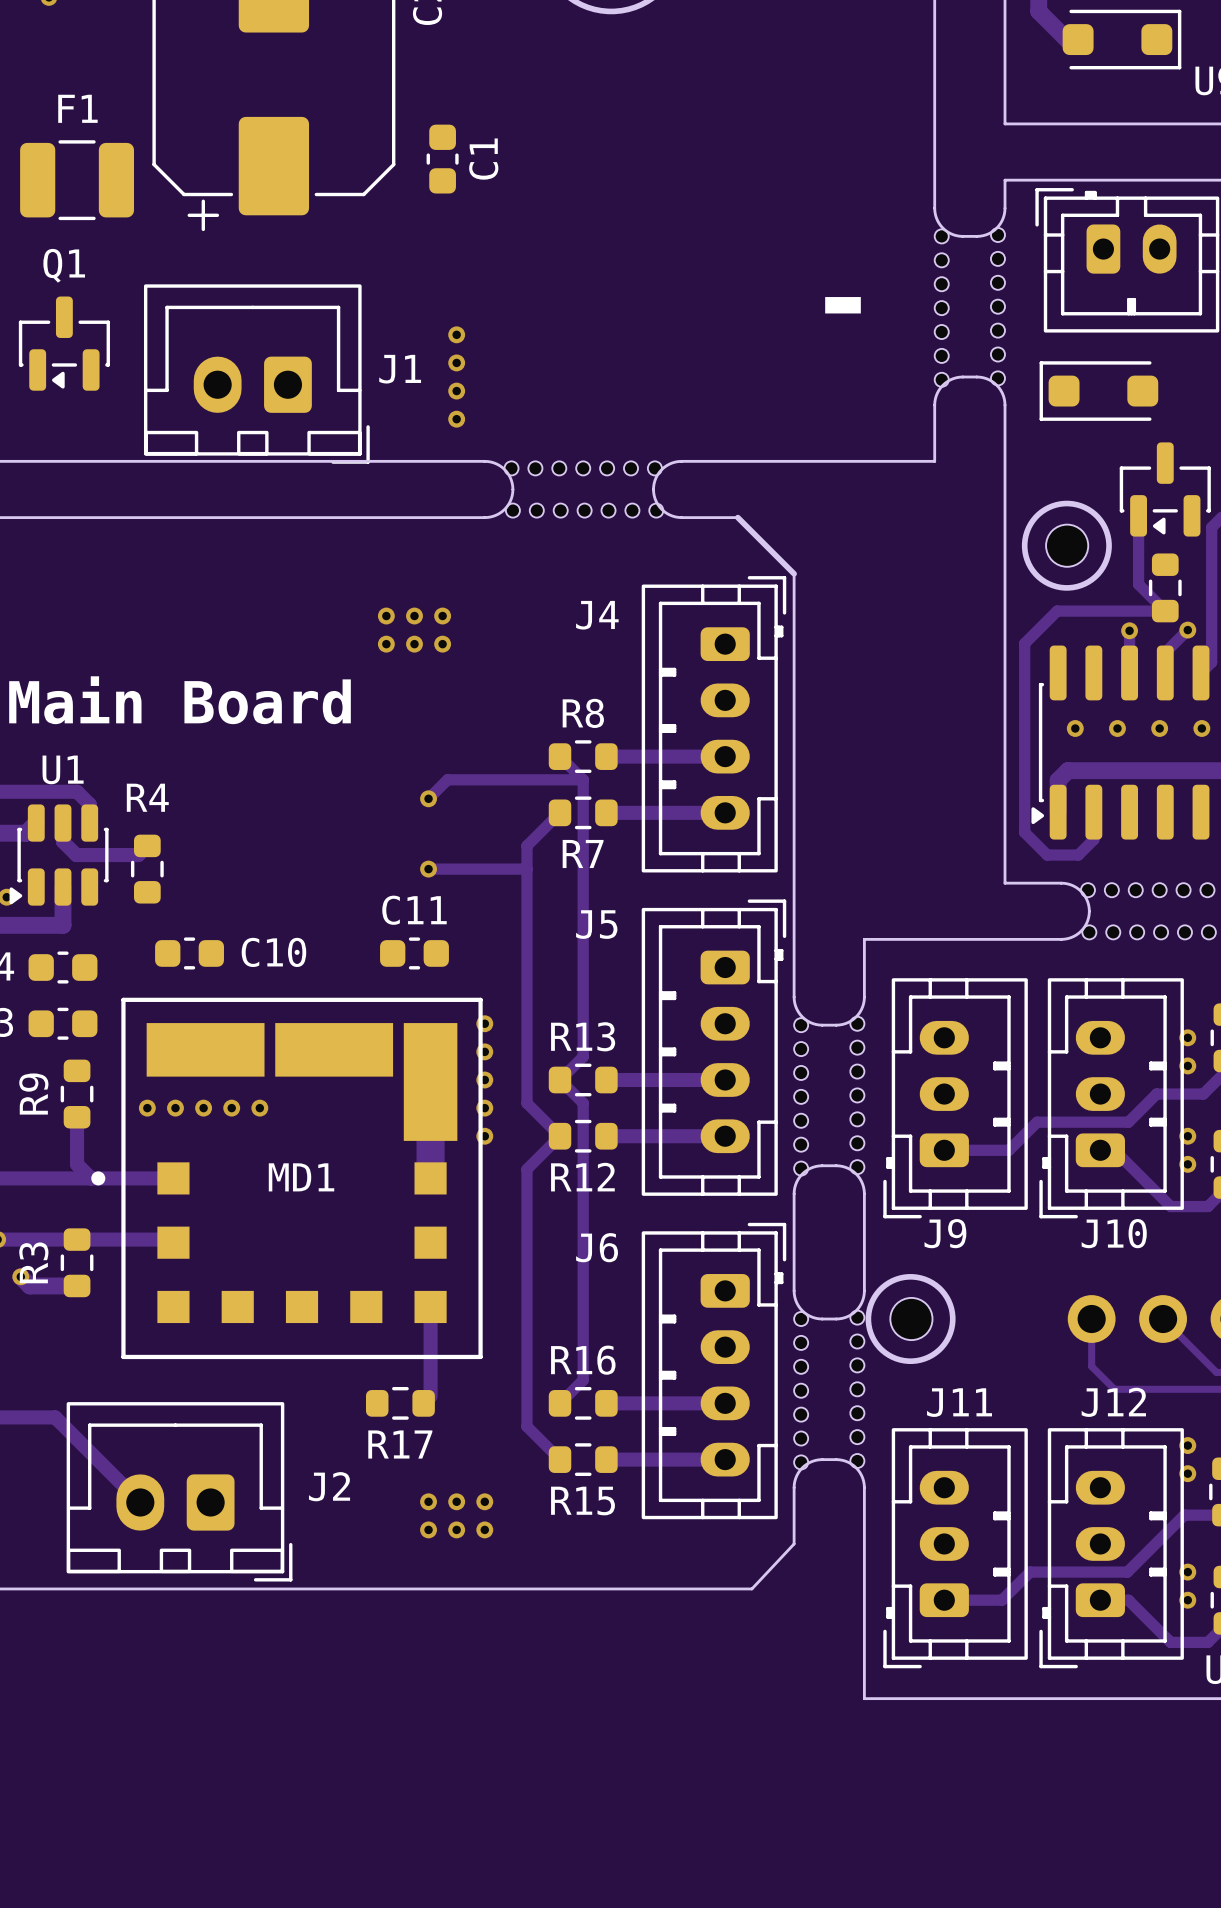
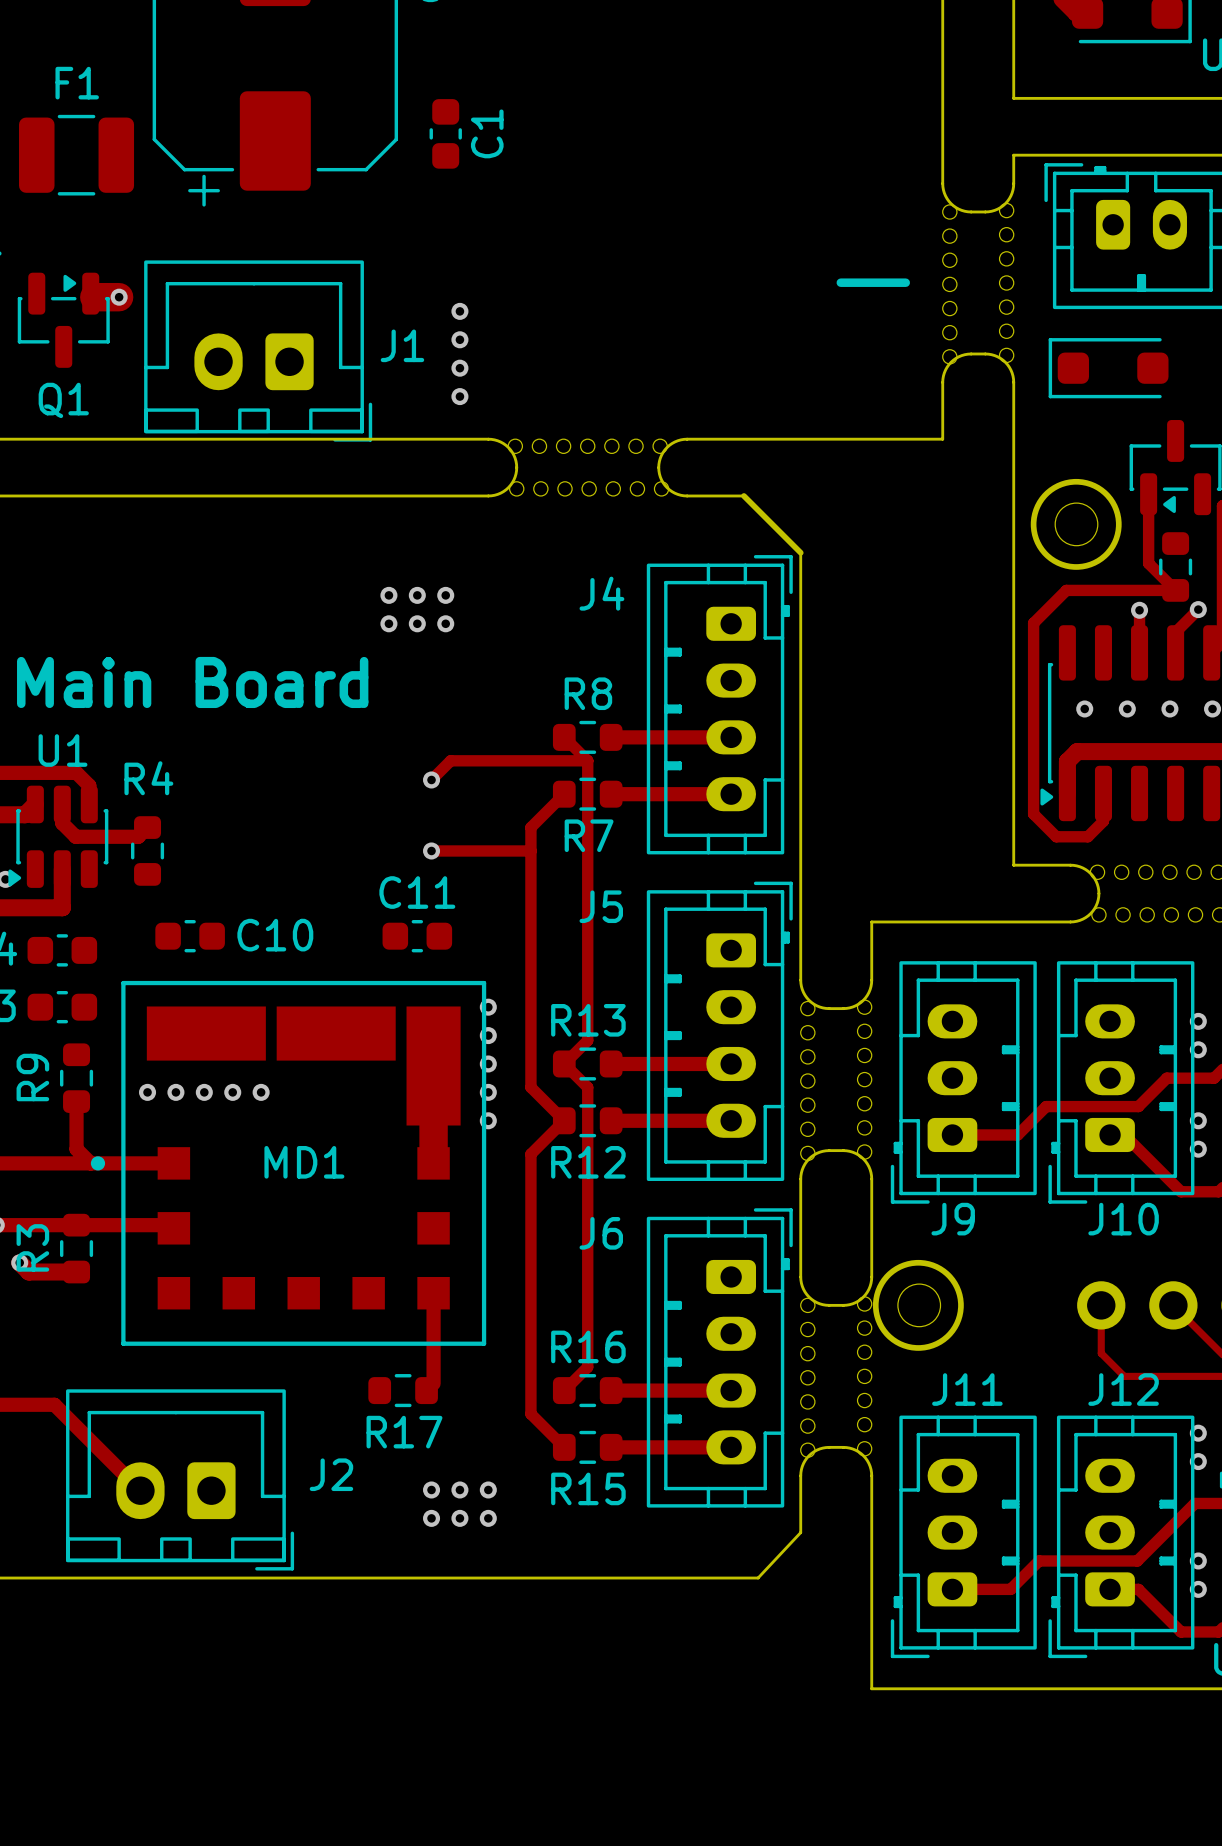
track: none -> (90, 293) (94, 297) (119, 297)
via: none -> (119, 297)
Q1 rotation: 0° (64, 343) -> 180° (63, 320)

